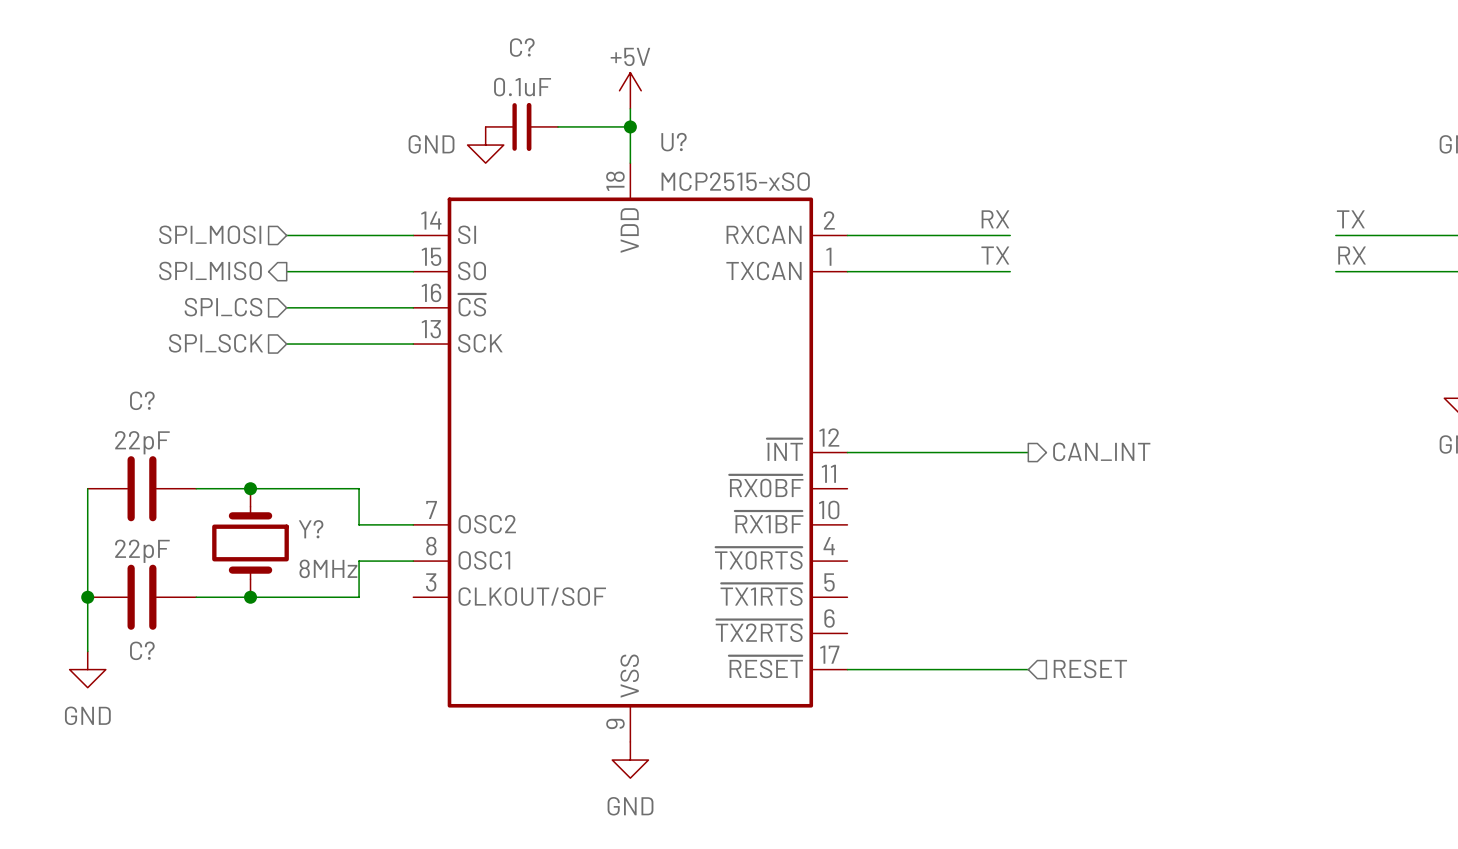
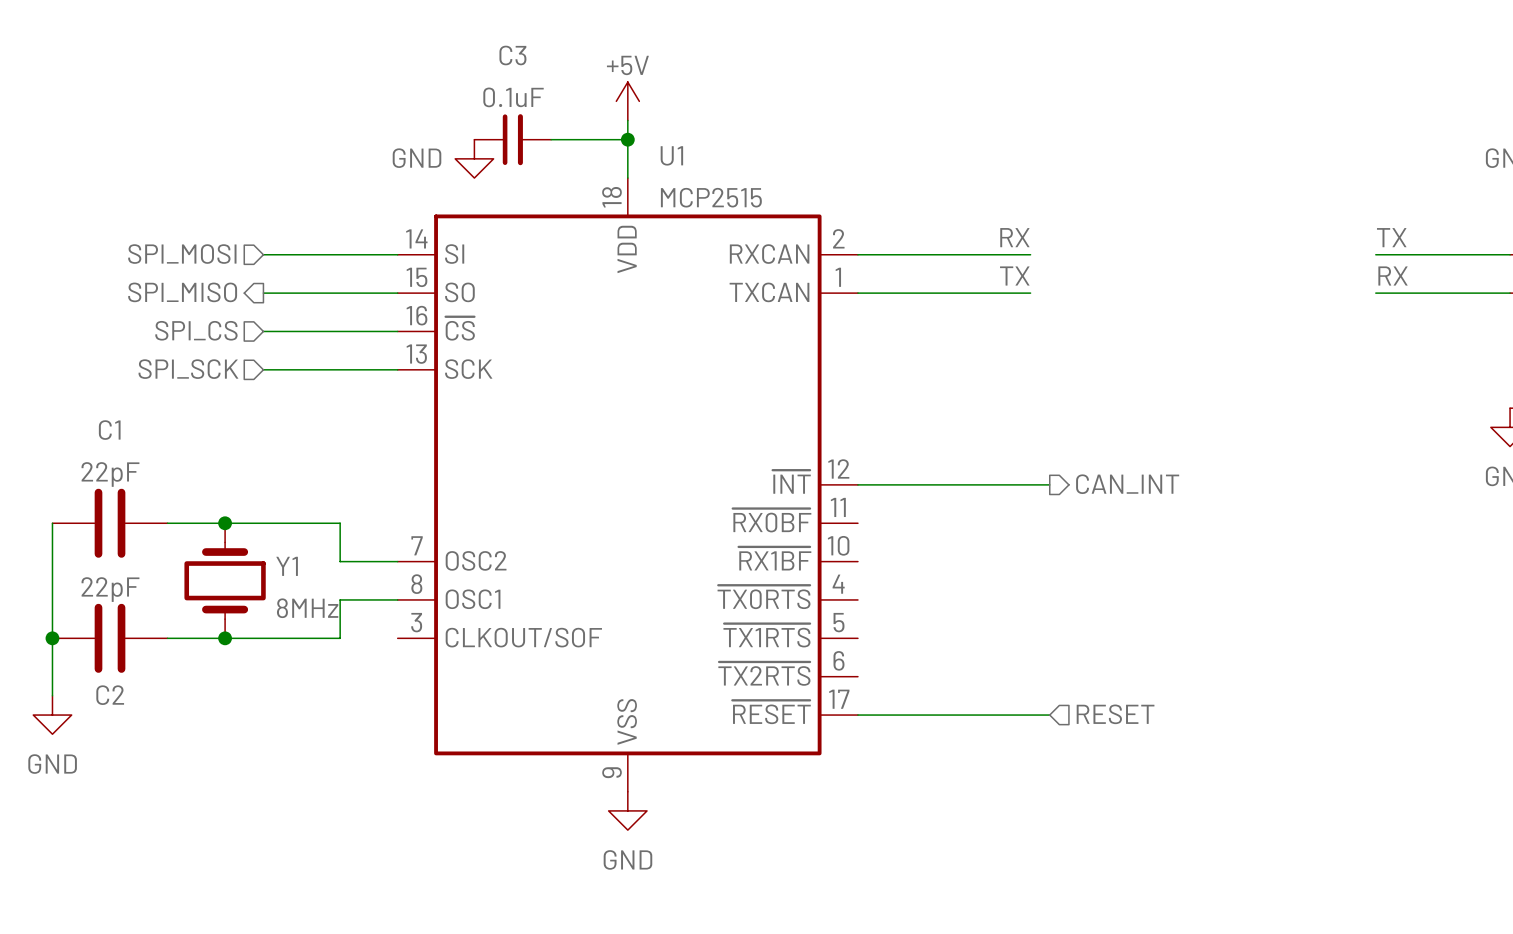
C? name: C? (522, 47) -> C3 (512, 55)
U? name: U? (674, 142) -> U1 (671, 155)
U? value: MCP2515-xSO (735, 181) -> MCP2515 (711, 197)
C? name: C? (142, 400) -> C1 (109, 430)
Y? name: Y? (311, 529) -> Y1 (287, 566)
C? name: C? (142, 650) -> C2 (110, 695)

